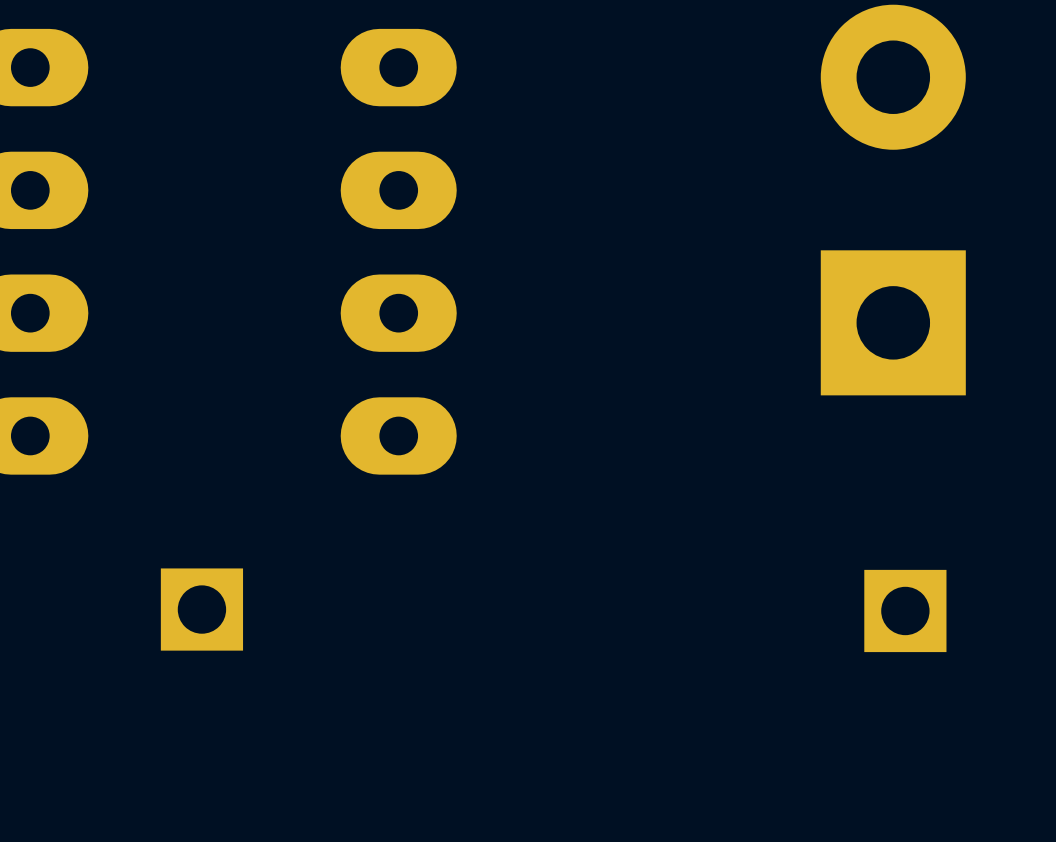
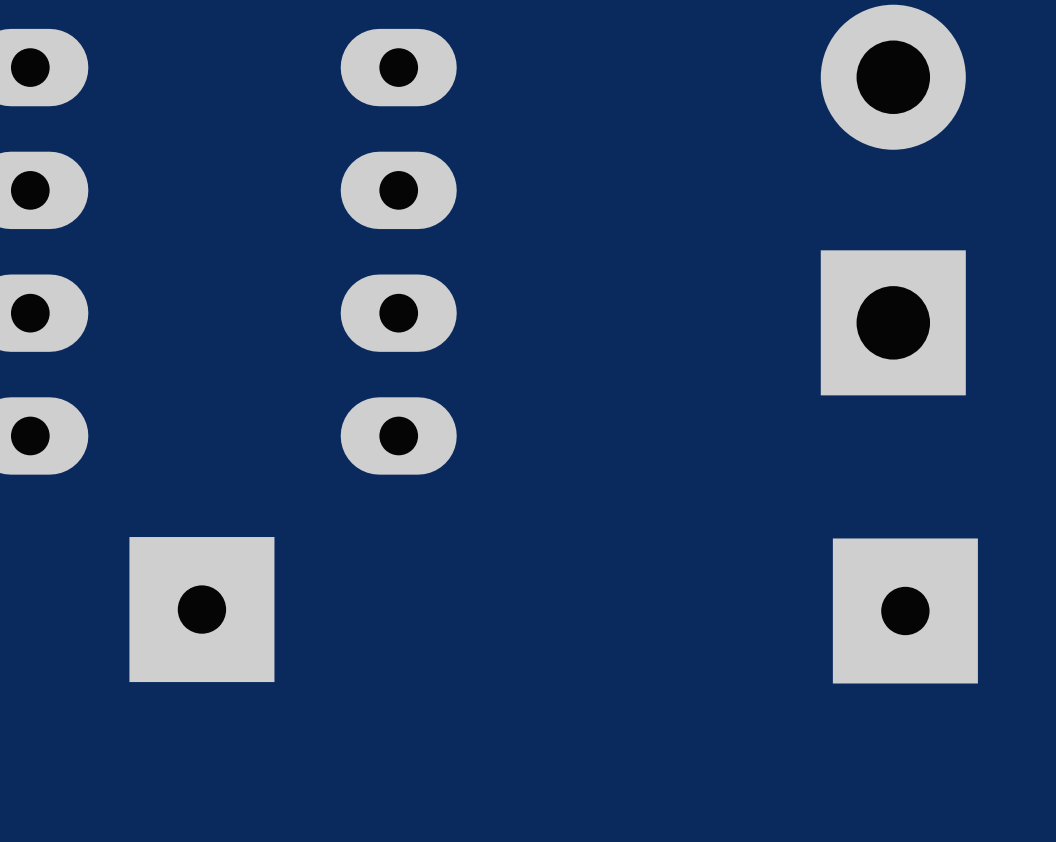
part footprint: [160, 568, 244, 651] -> [129, 537, 275, 683]
part footprint: [864, 569, 947, 653] -> [832, 538, 978, 684]

